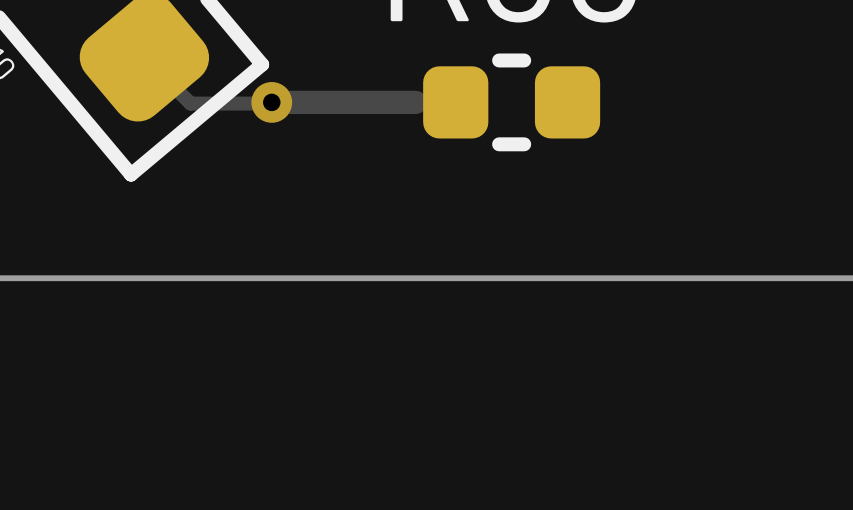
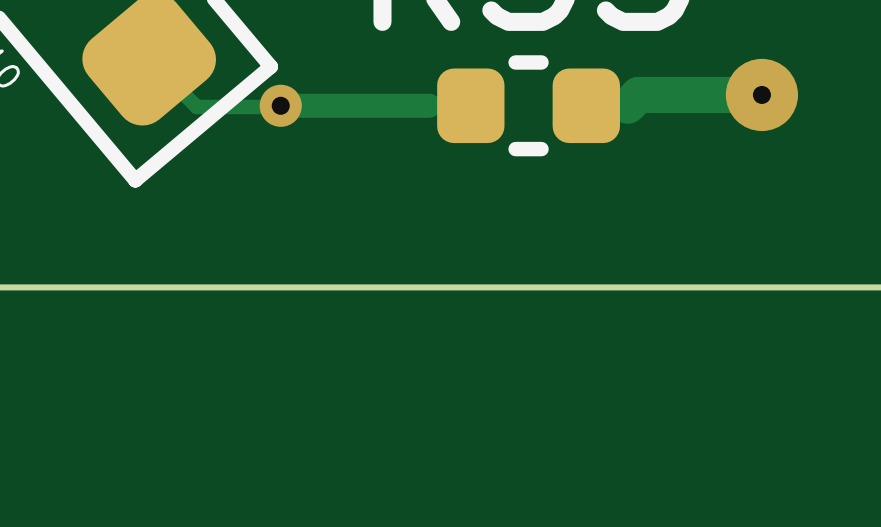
track: none -> (761, 94) (638, 94) (627, 105)
via: none -> (761, 94)

